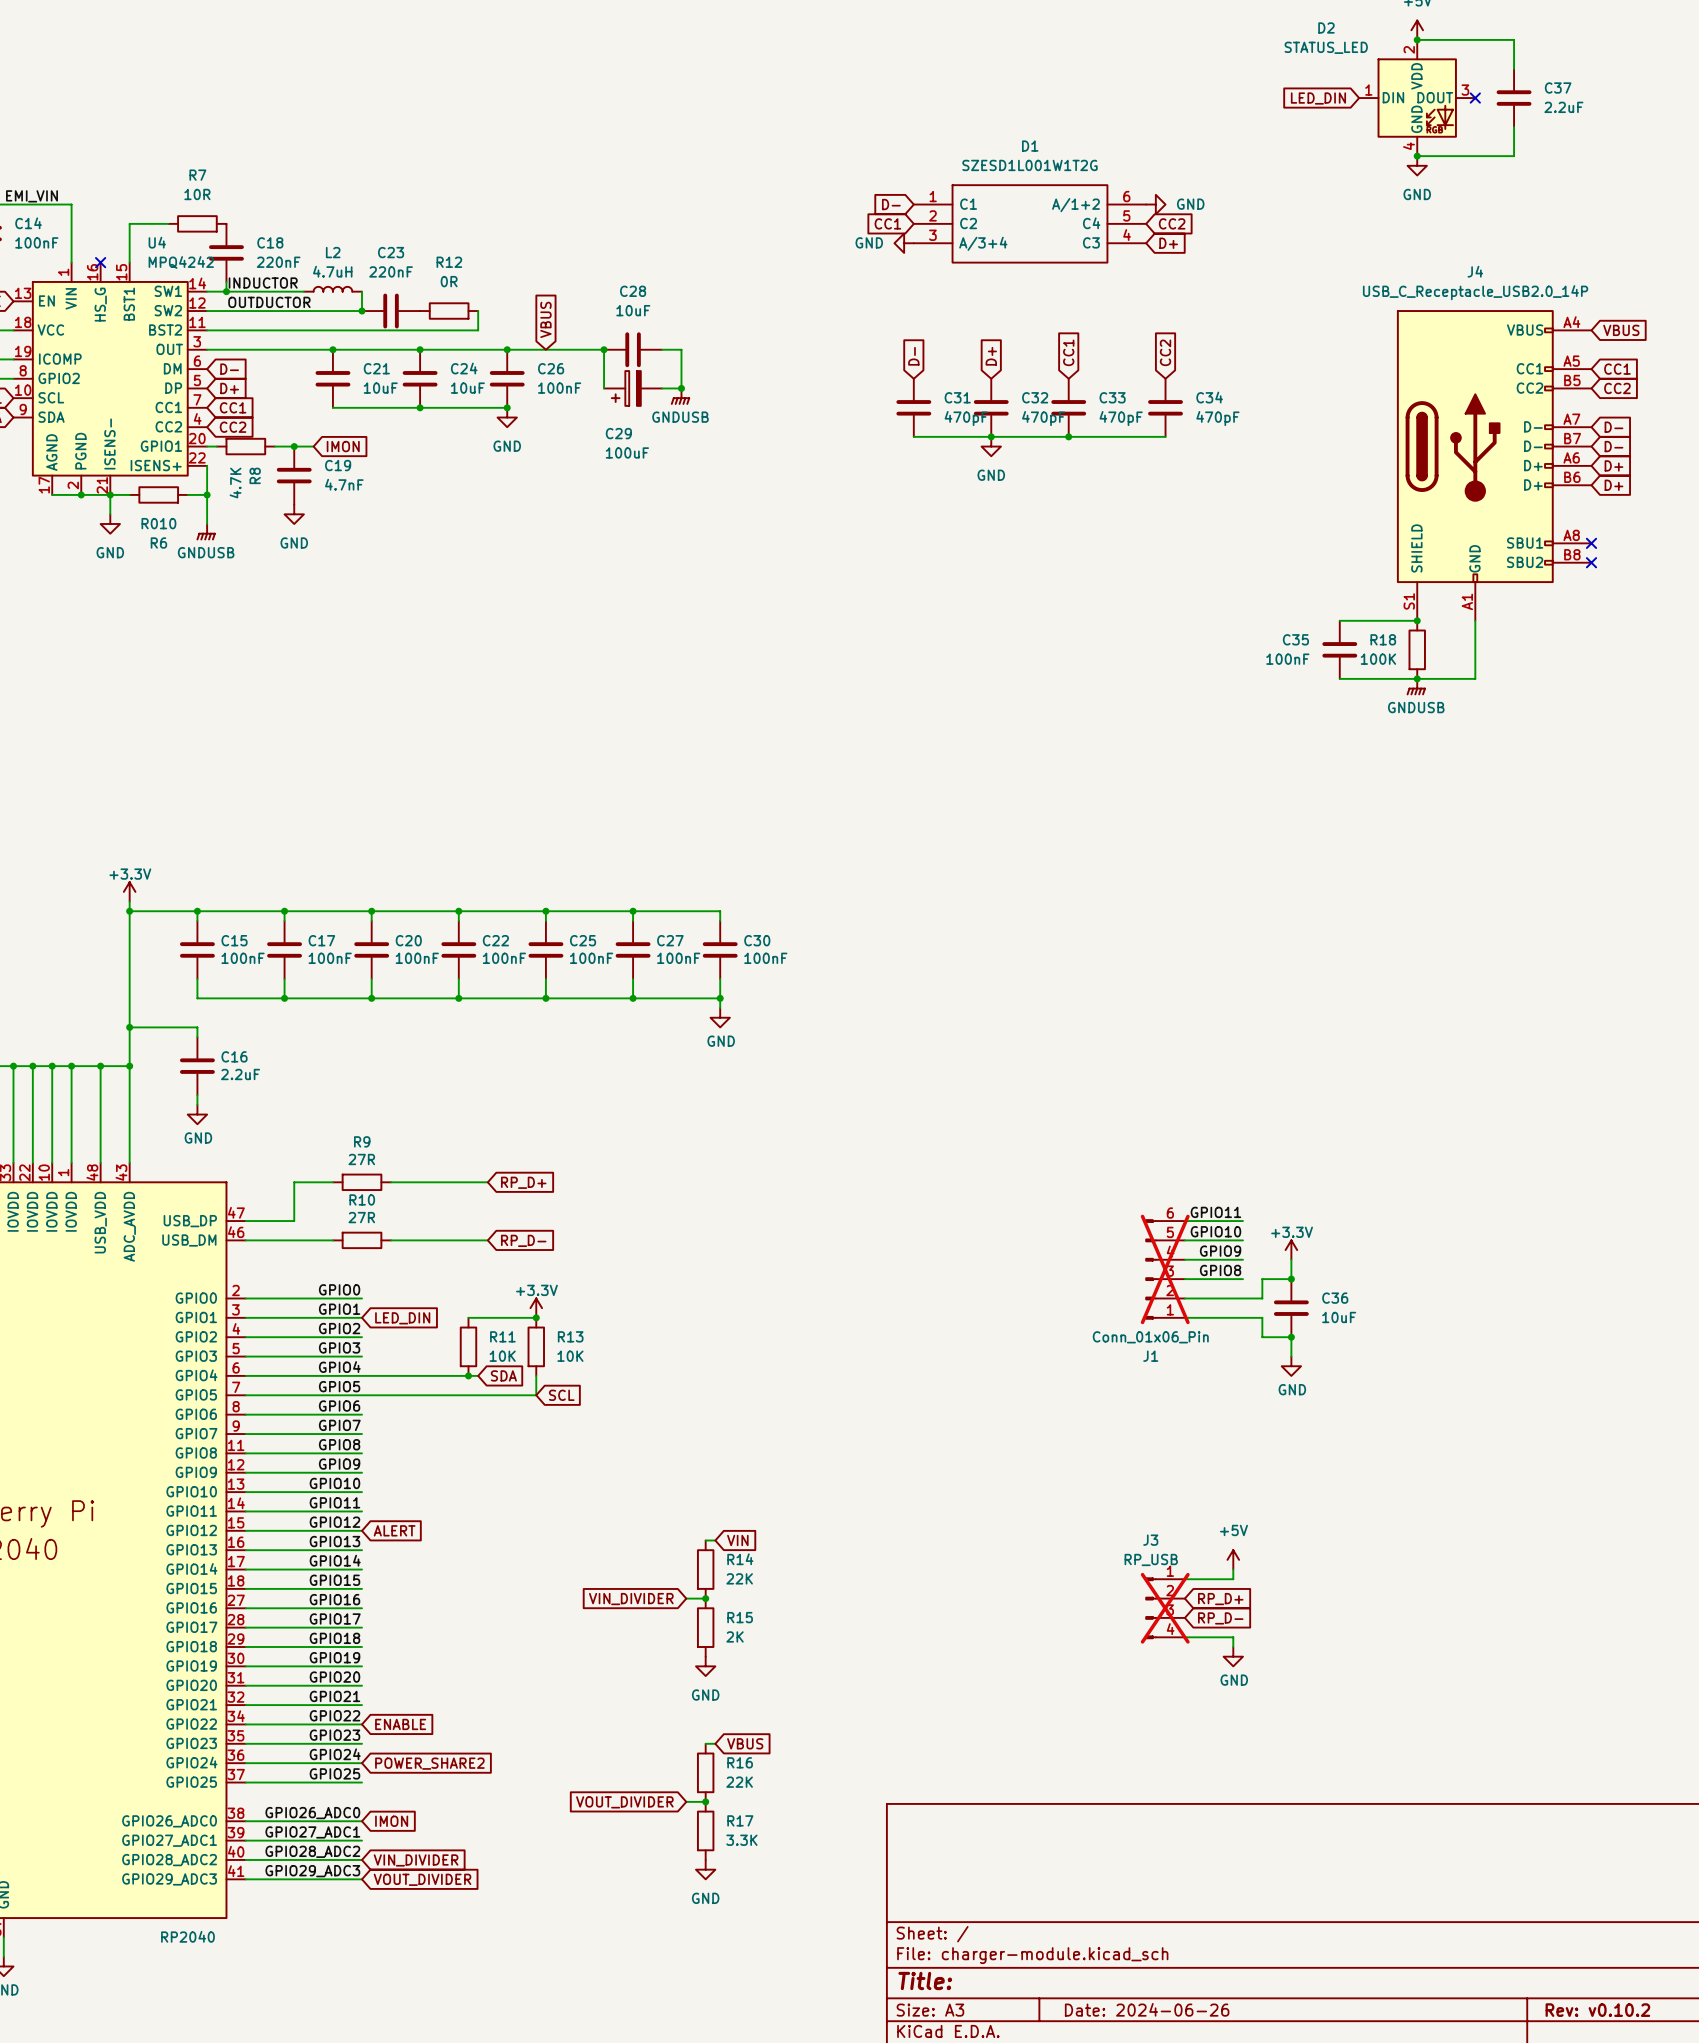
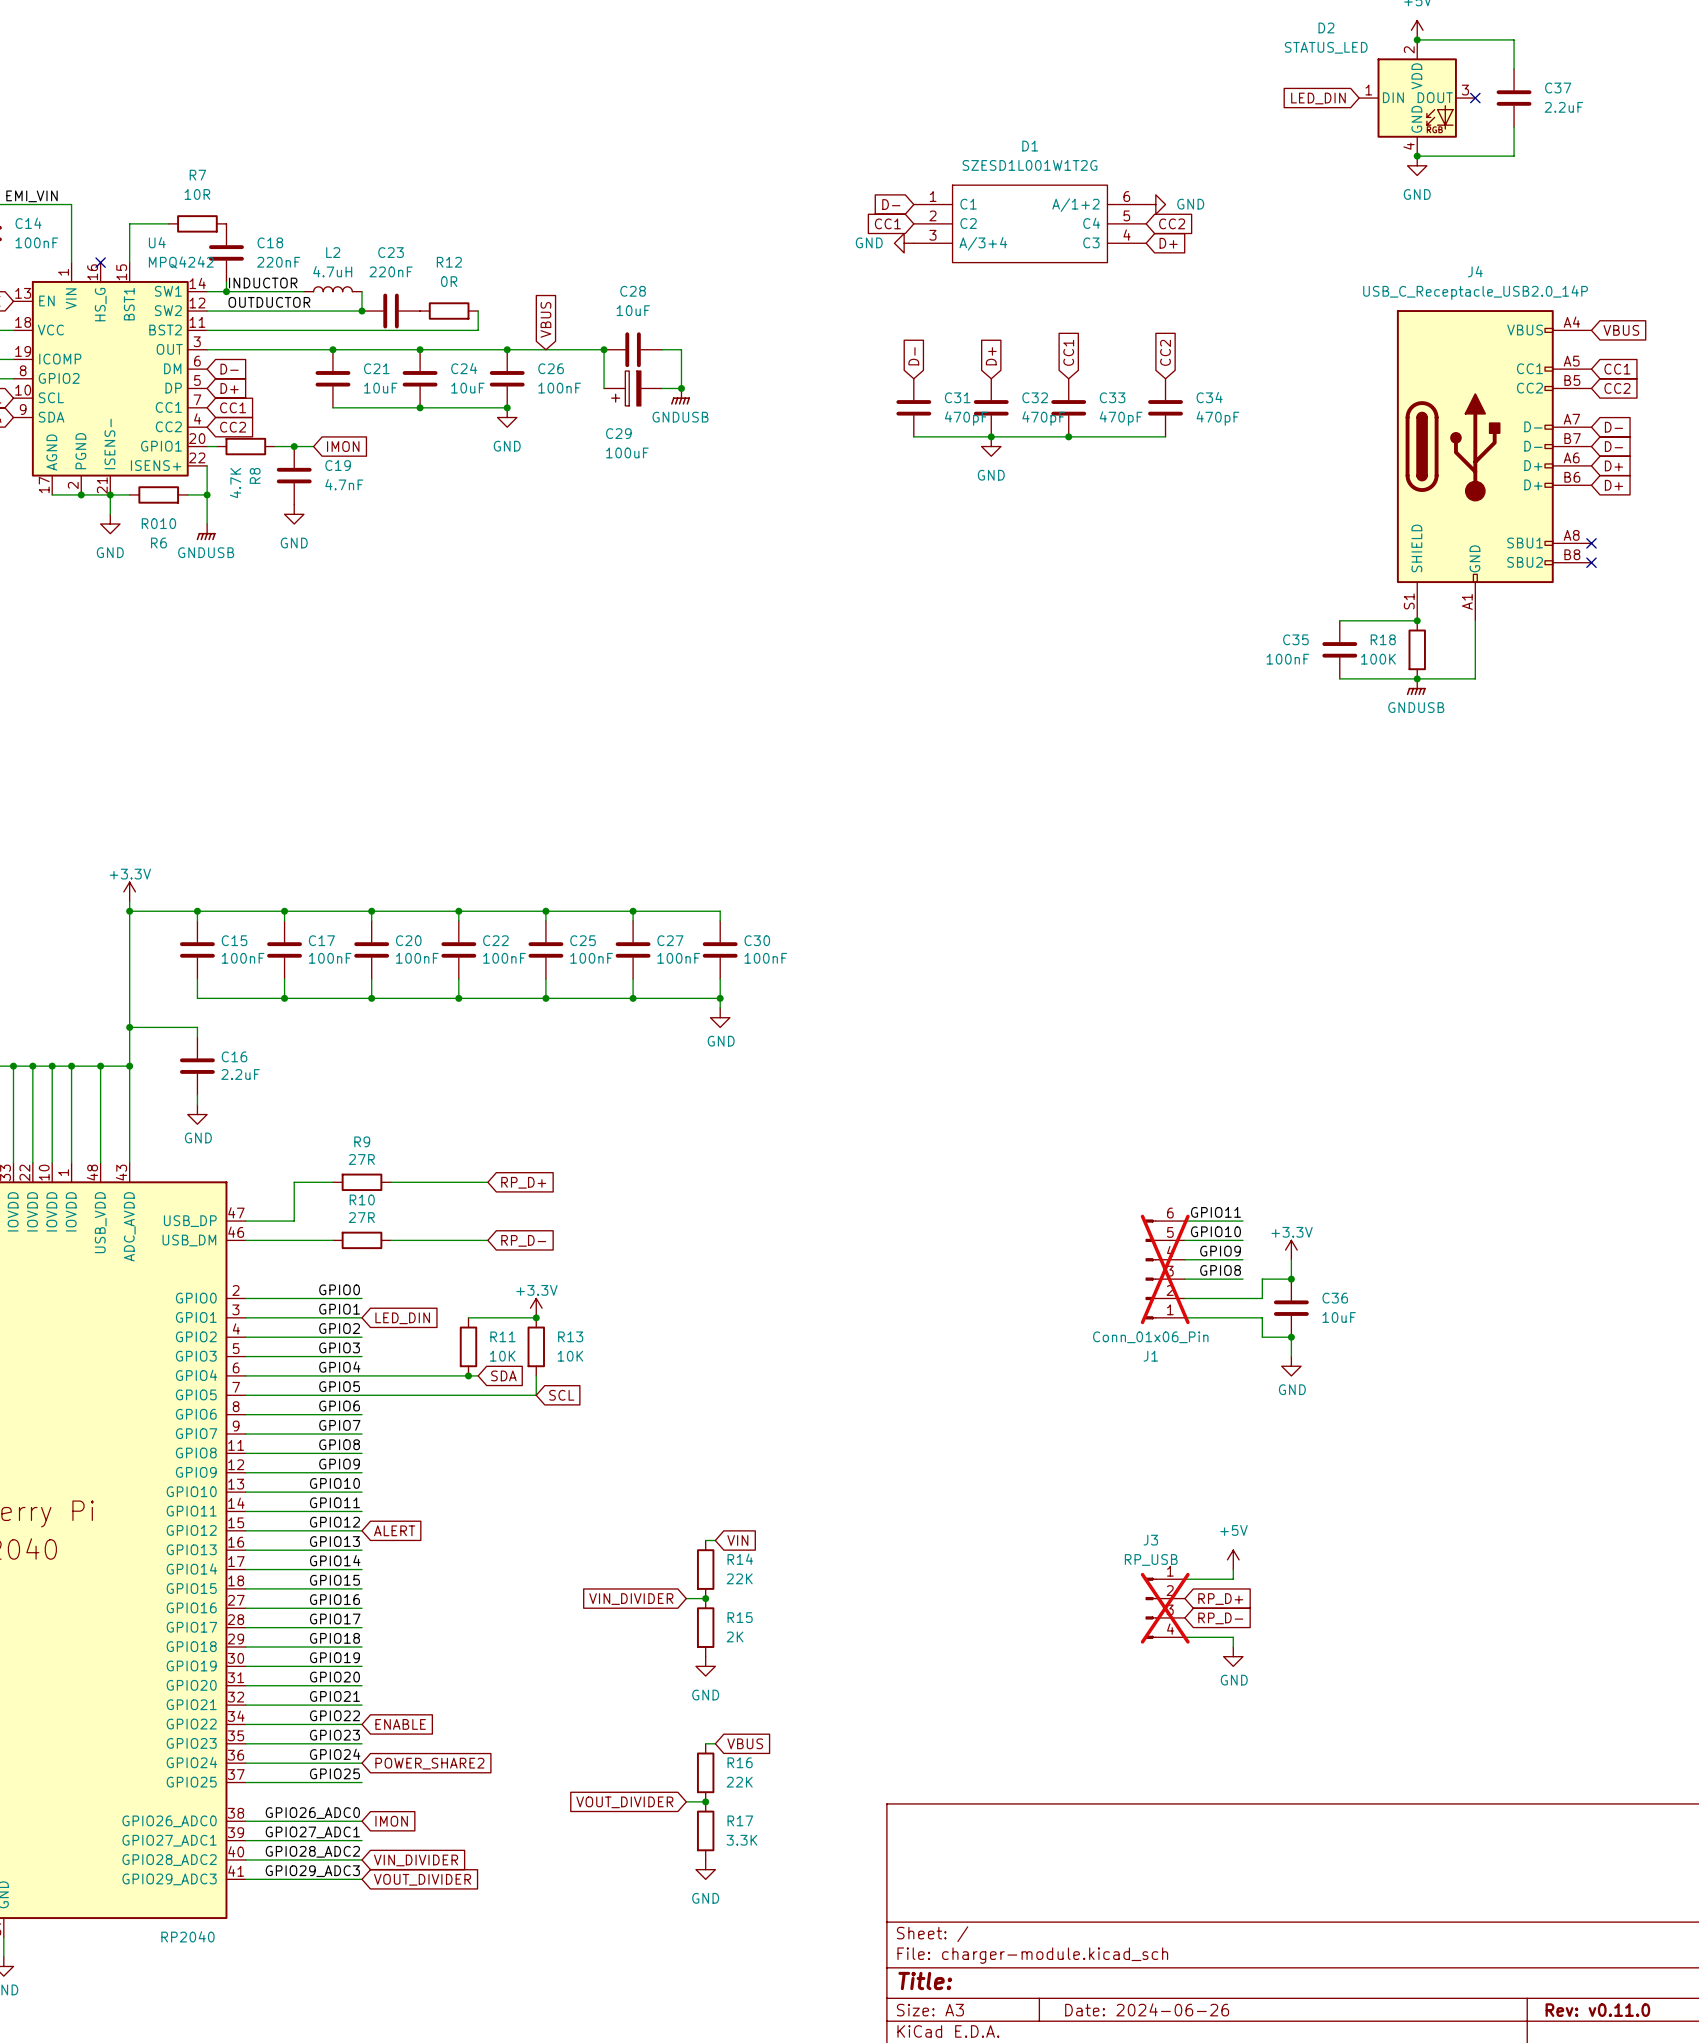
title block: Rev: v0.10.2 (1597, 2010) -> Rev: v0.11.0 (1597, 2010)

